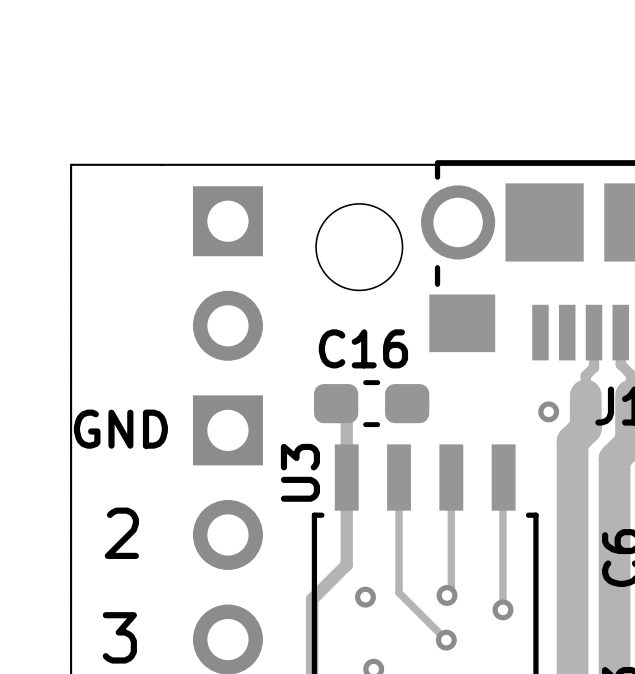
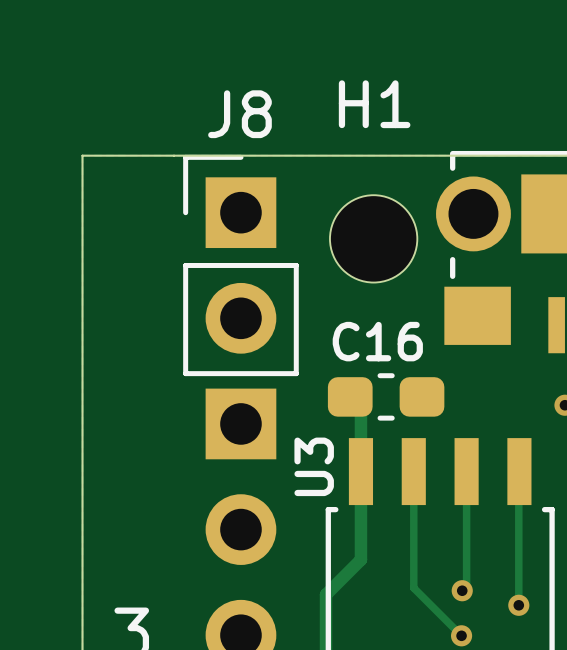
H1 name: none -> H1 (374, 104)
J8: none -> (240, 265)
text: GND (120, 429) -> none
text: 2 (121, 533) -> none
via: (365, 597) -> none

